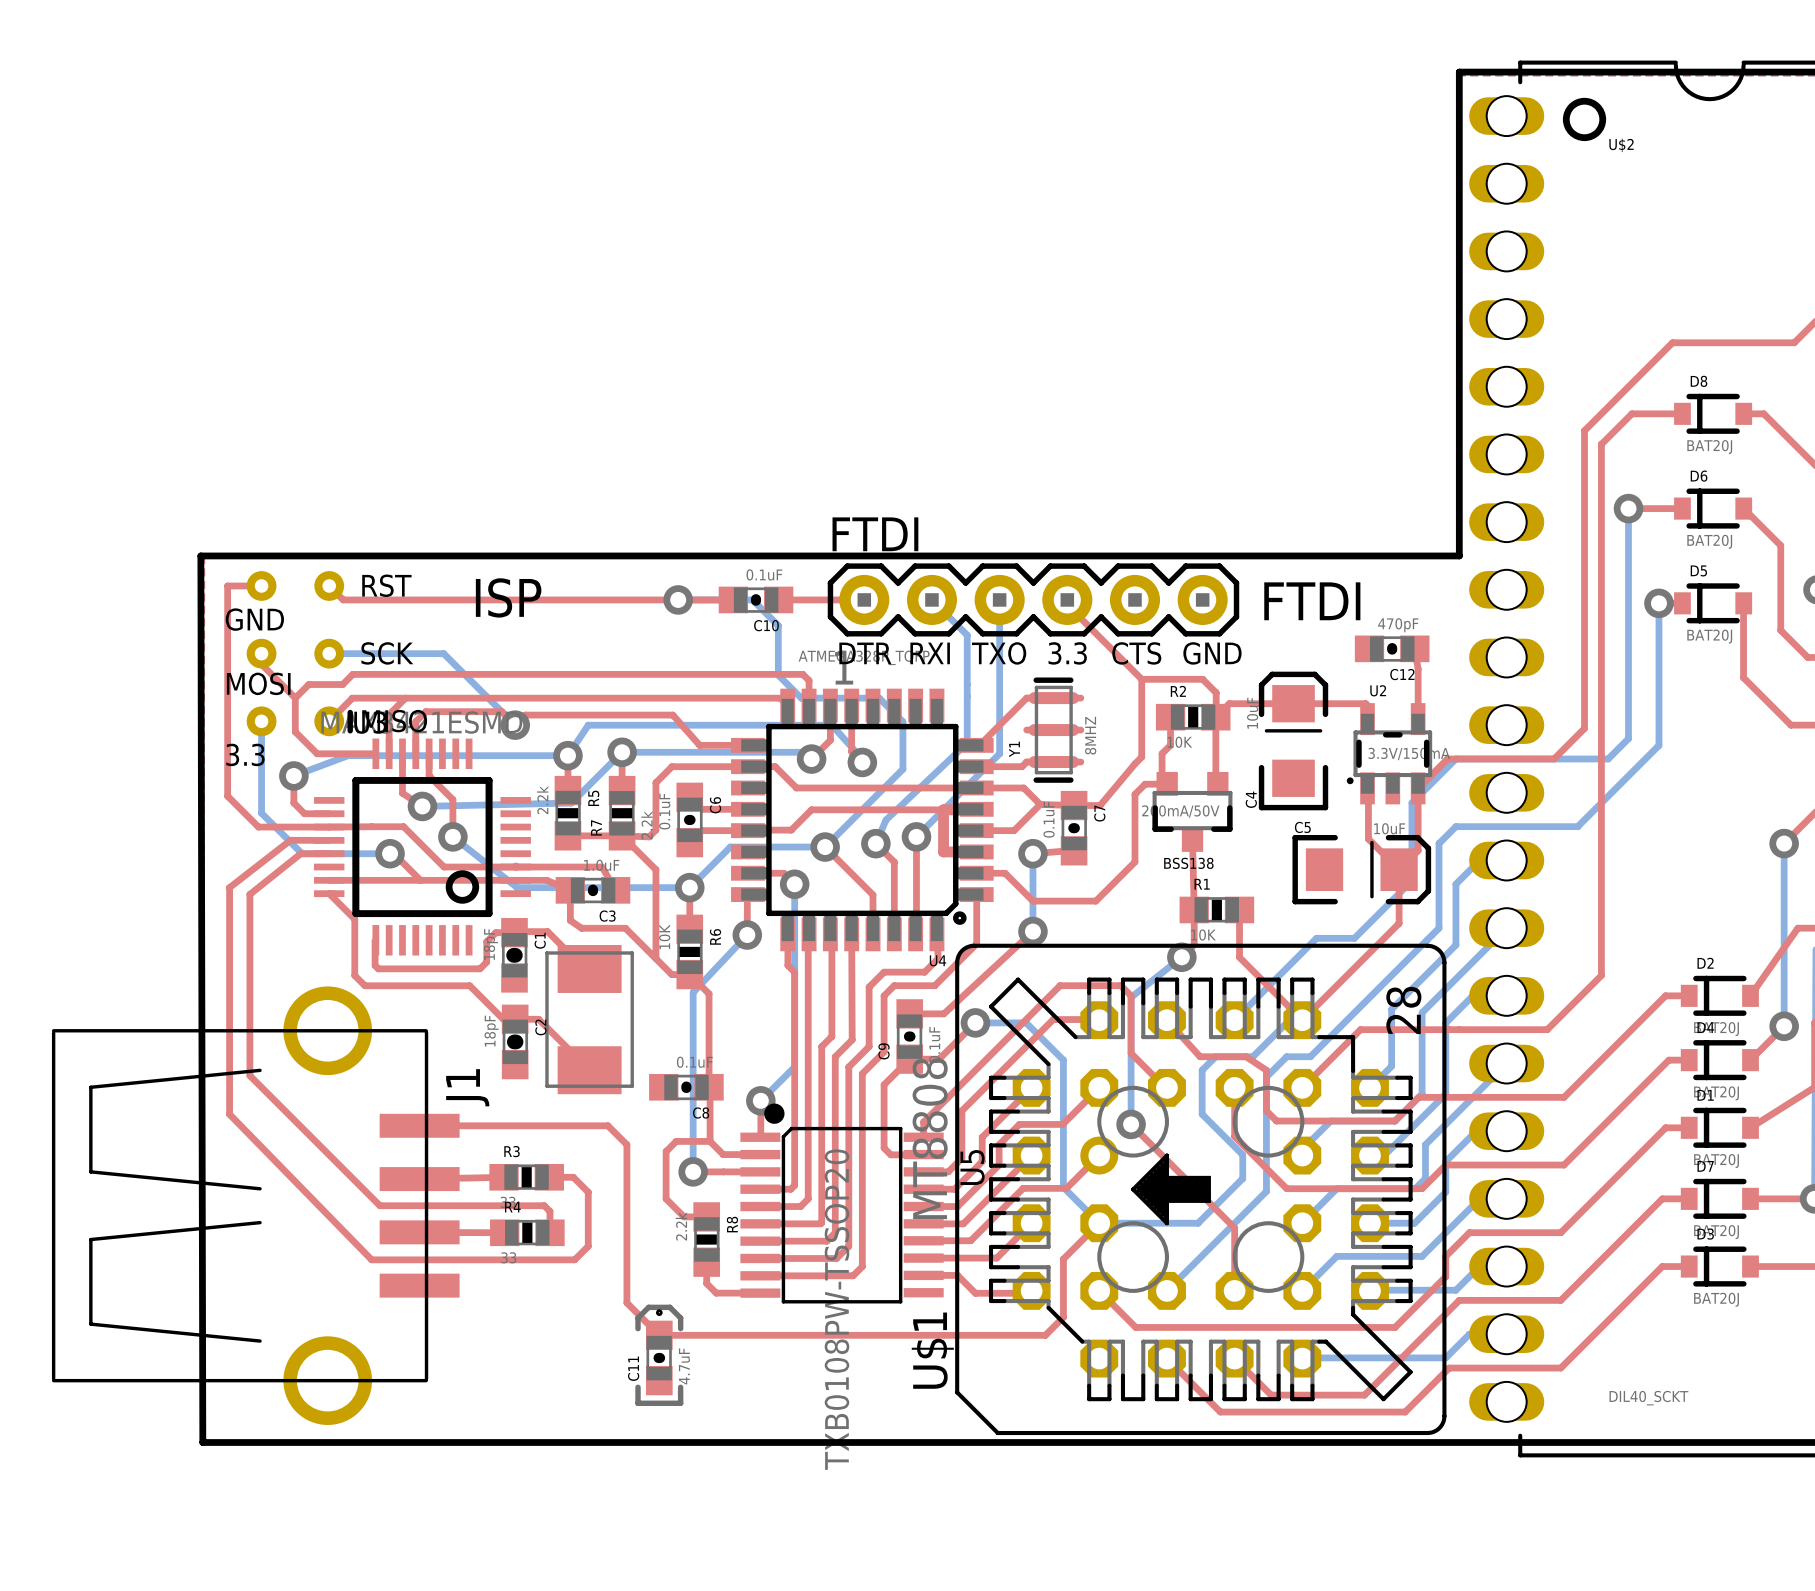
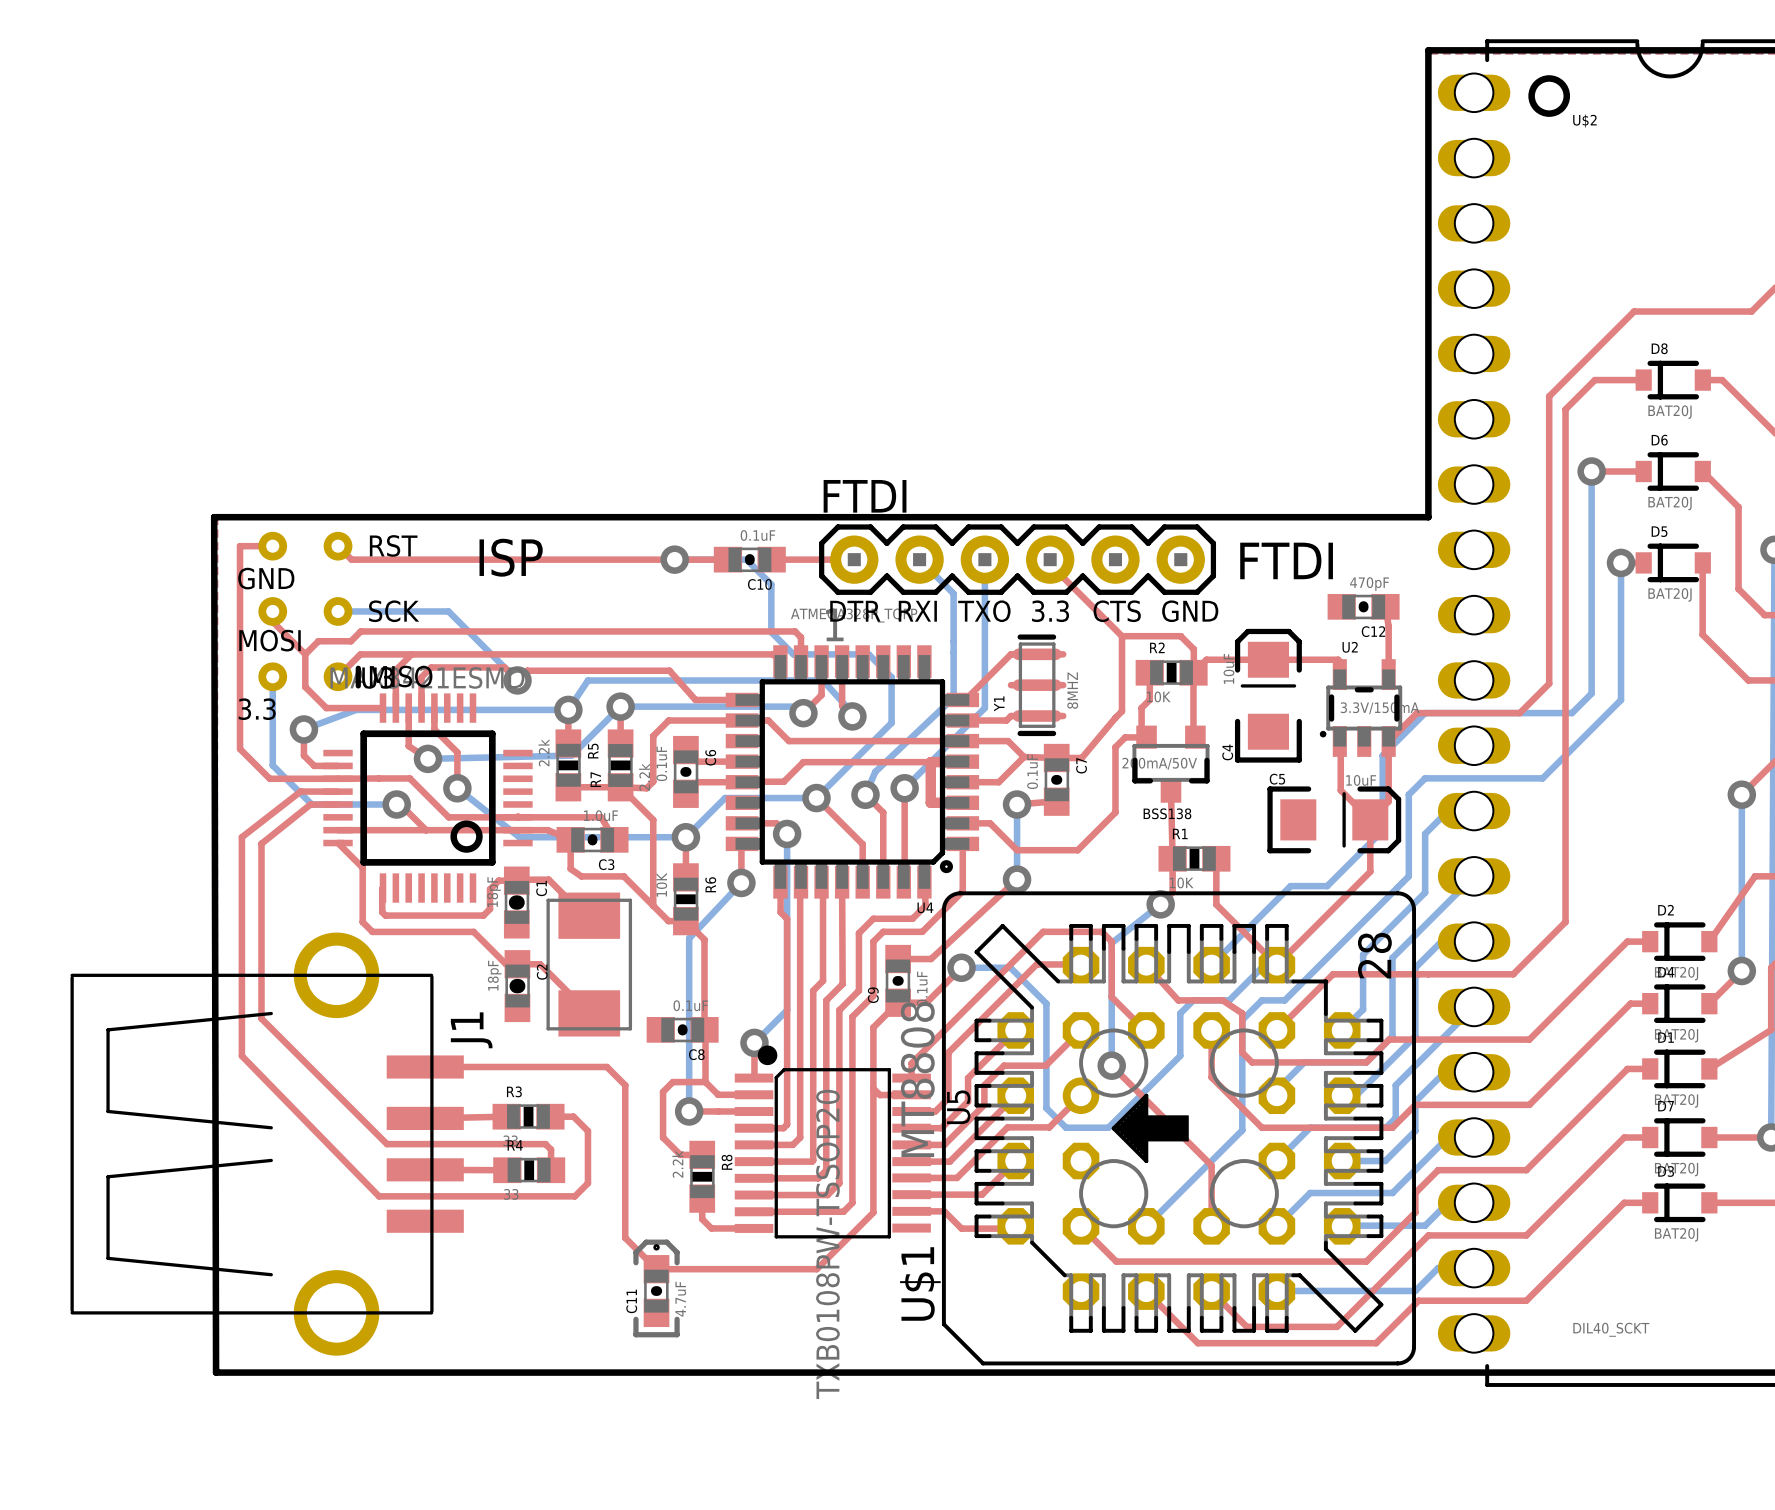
bottom track: (1202, 1114) (1242, 1154) (1242, 1178) (1198, 1223) (1099, 1223) (1063, 1187) (1063, 1168) -> (1180, 1055) (1108, 1127) (1066, 1127) (1046, 1108)
top track: (1099, 1223) (1063, 1259) (1063, 1317) (1045, 1335) (825, 1335) -> (873, 1088) (873, 1212) (816, 1269)

